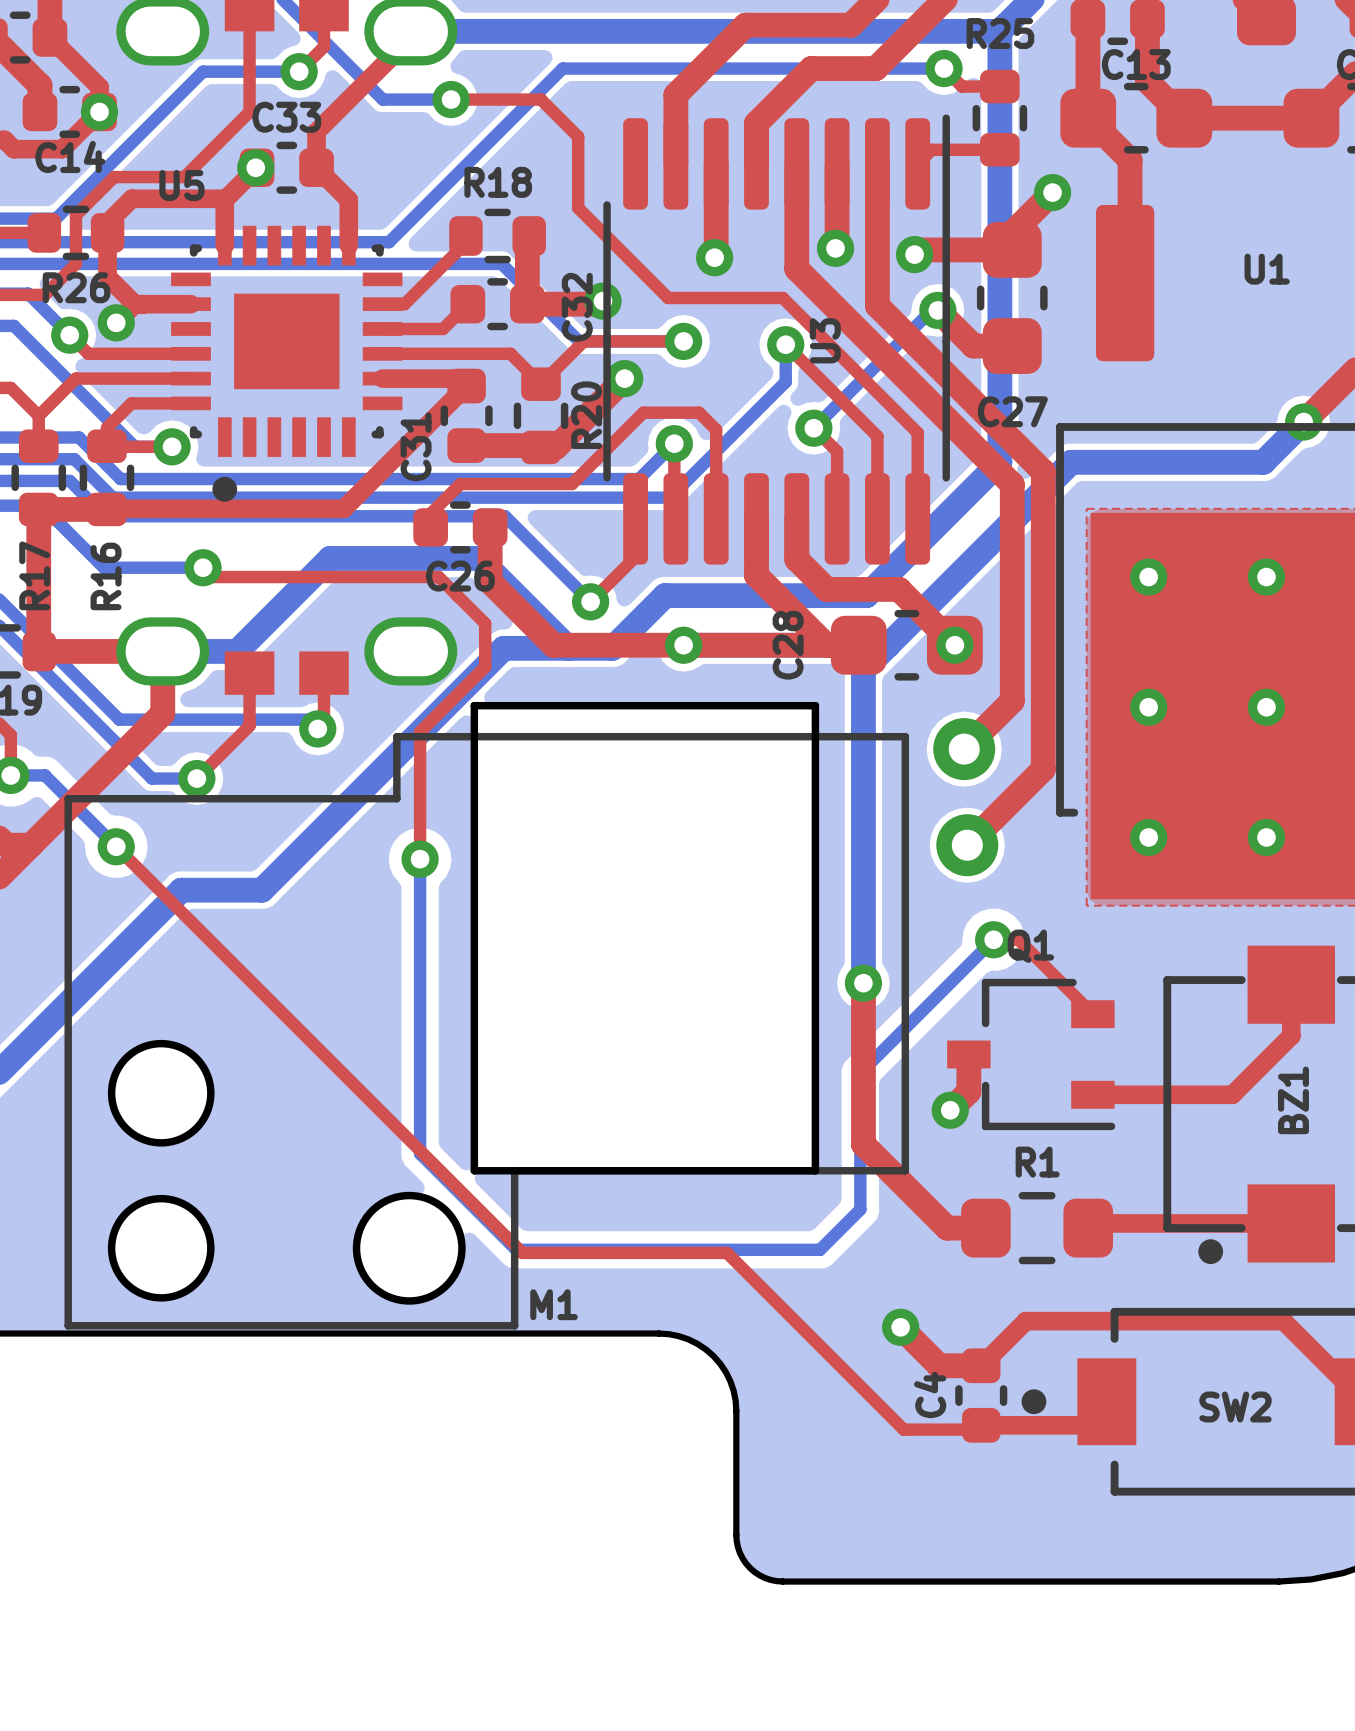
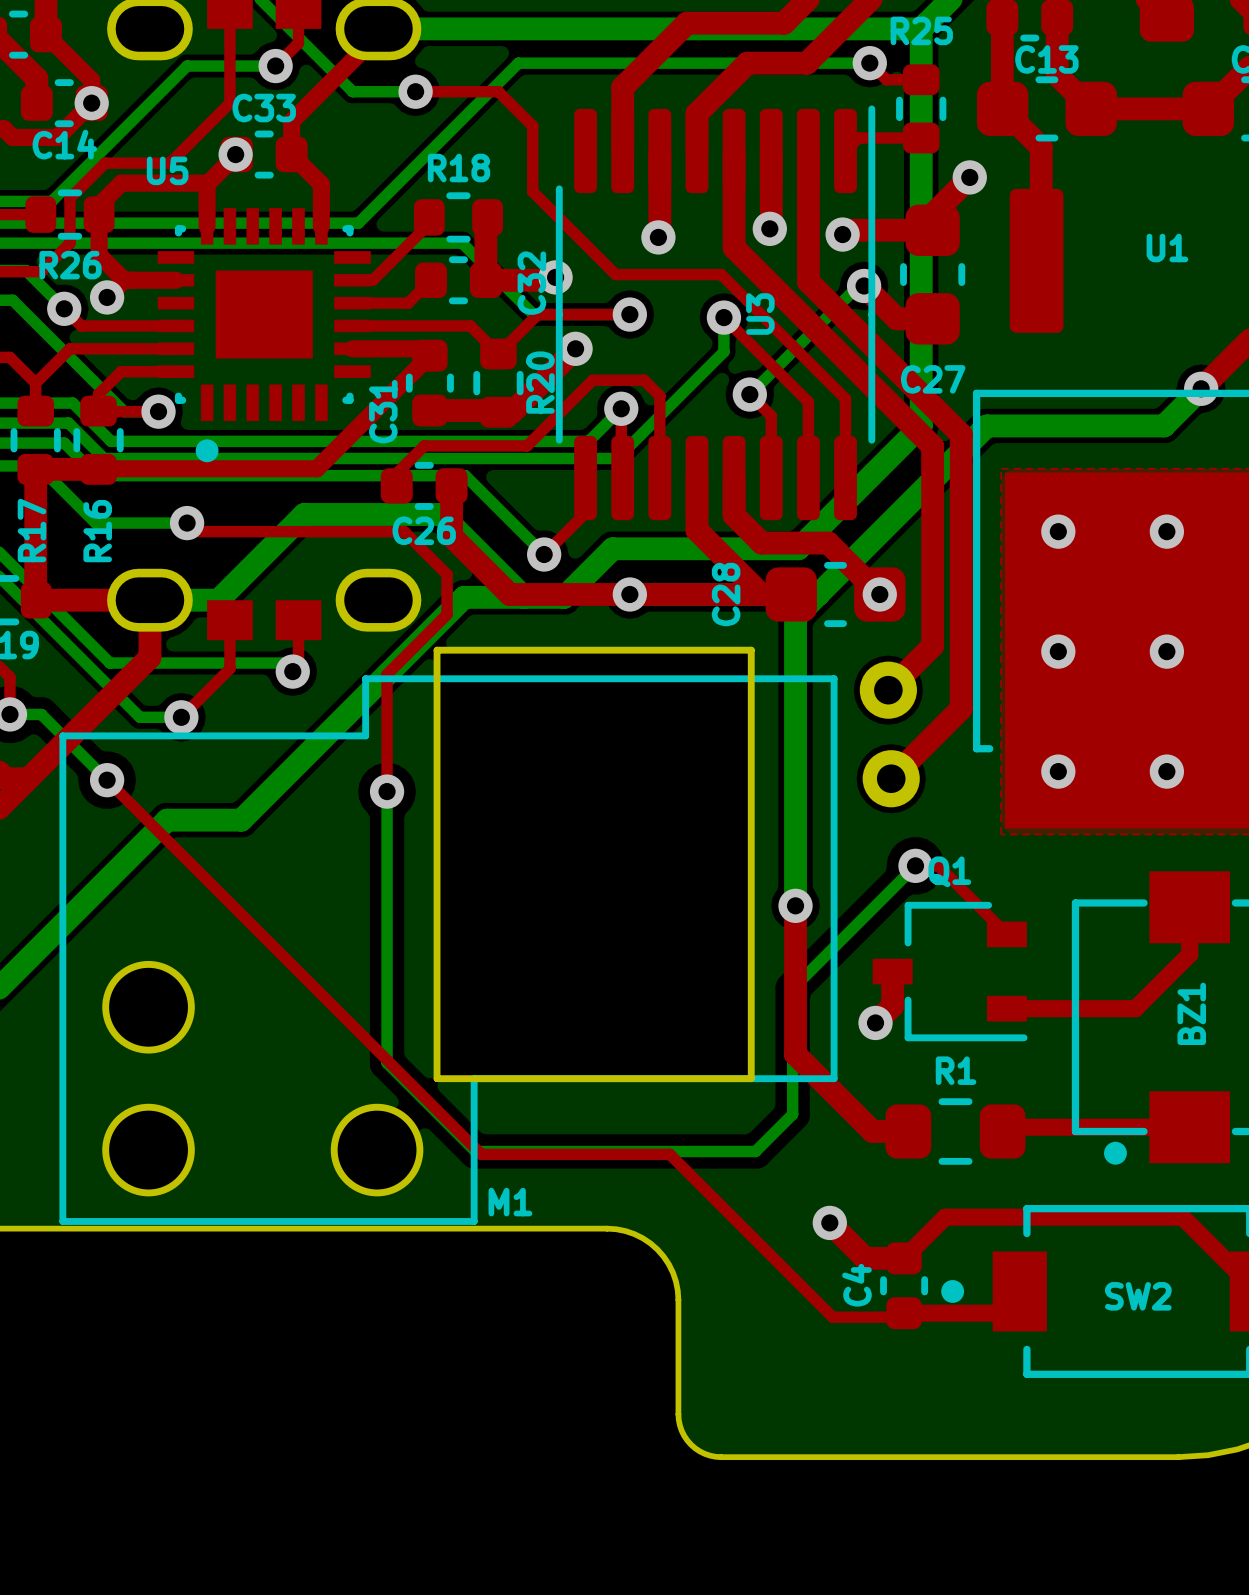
M1 footprint: [64, 701, 999, 1330] -> [59, 646, 920, 1225]

